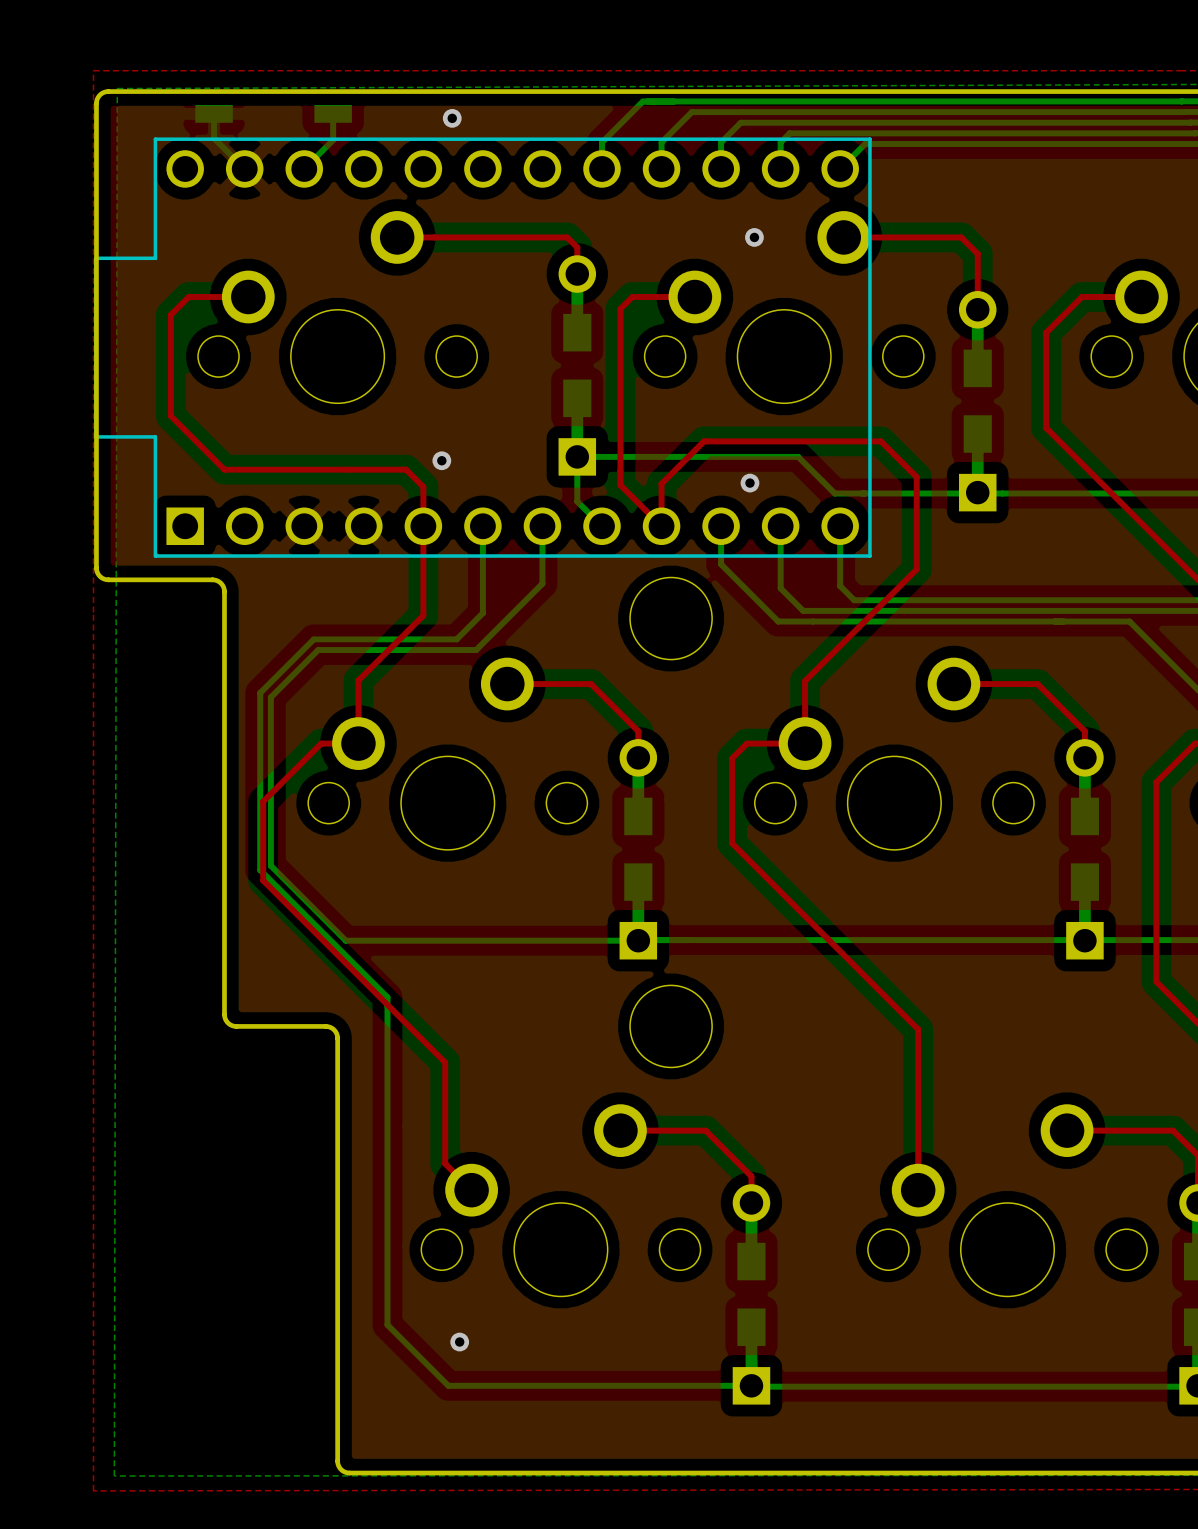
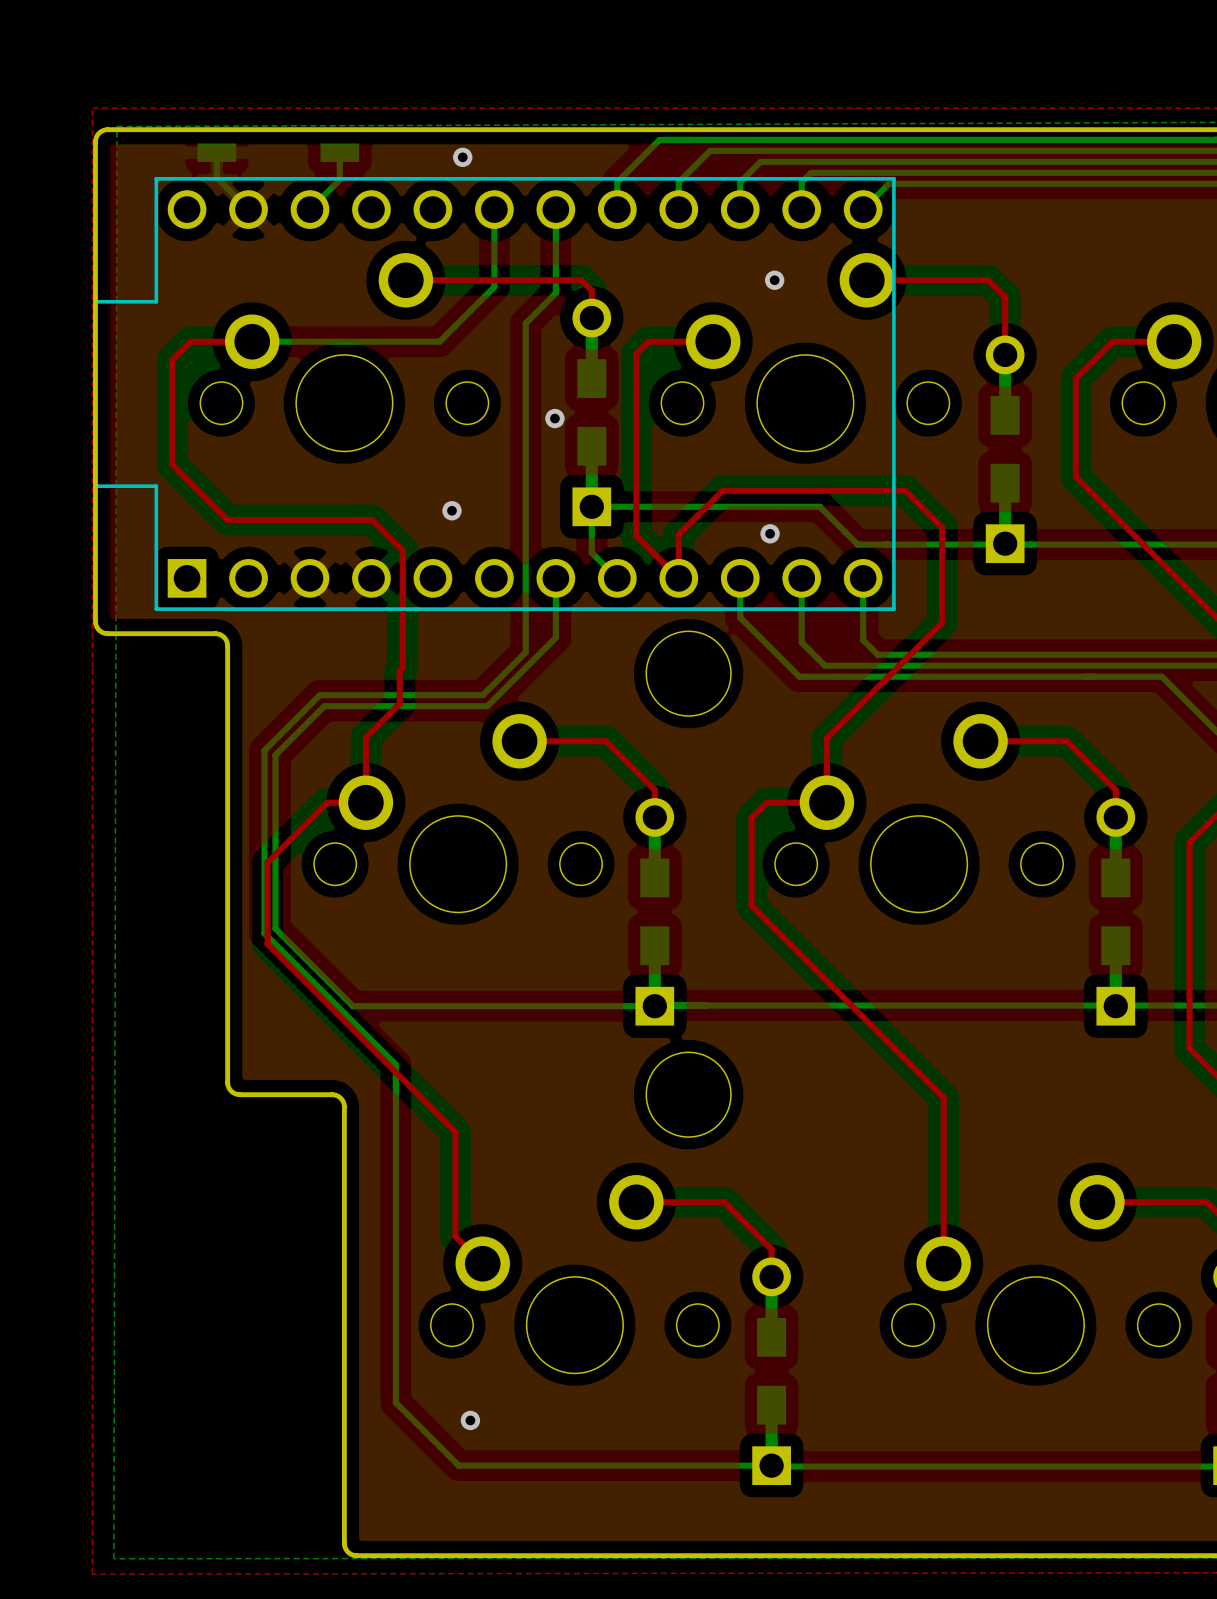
bottom track: none -> (494, 209) (494, 287) (439, 341) (252, 341)
via: none -> (554, 418)
top track: (364, 469) (406, 469) (423, 486) (423, 615) (391, 647) -> (372, 519) (402, 550) (402, 667) (399, 670) (399, 703)
bottom track: (482, 526) (482, 613) (456, 639) -> (555, 209) (555, 293) (525, 323) (525, 652) (482, 695) (467, 695)

